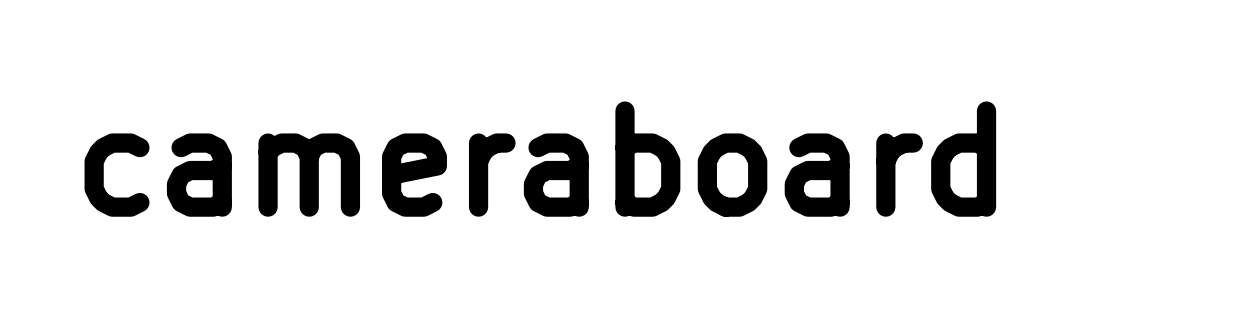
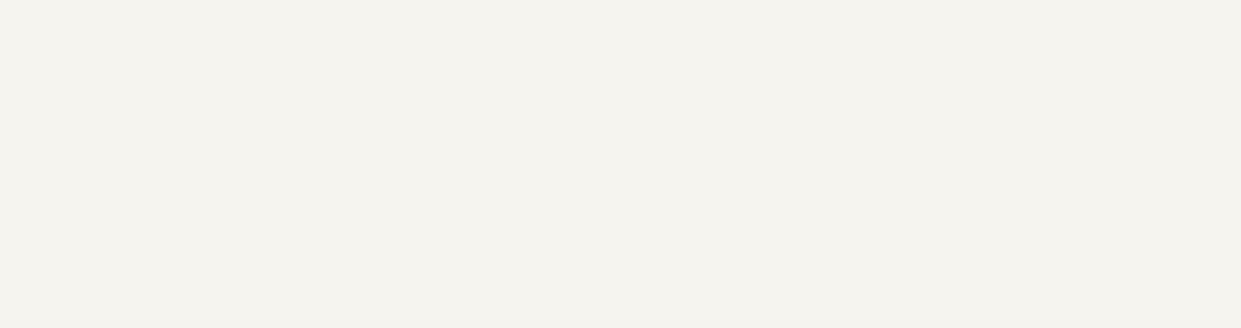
text: cameraboard (540, 159) -> none

